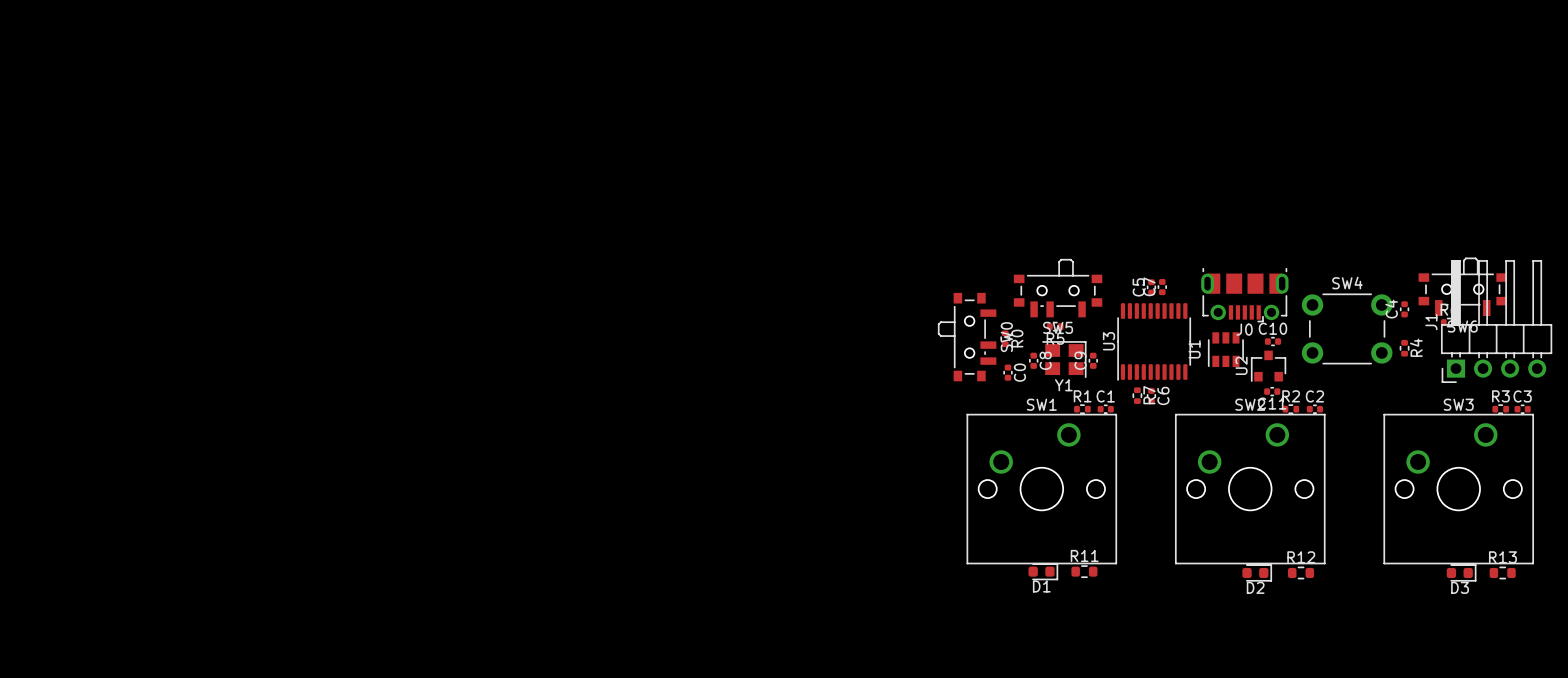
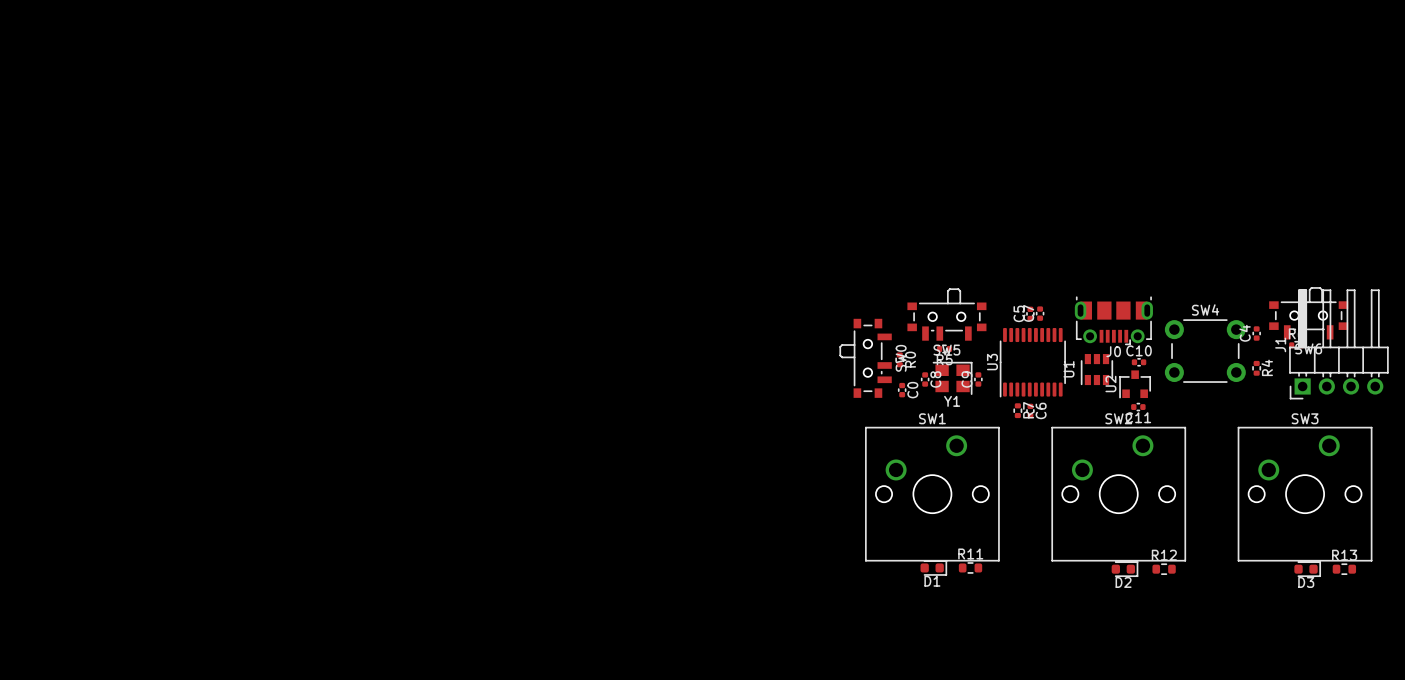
R1: (1082, 409) -> none
C1: (1105, 409) -> none
R2: (1290, 409) -> none
C2: (1314, 409) -> none
R3: (1500, 409) -> none
C3: (1522, 409) -> none

